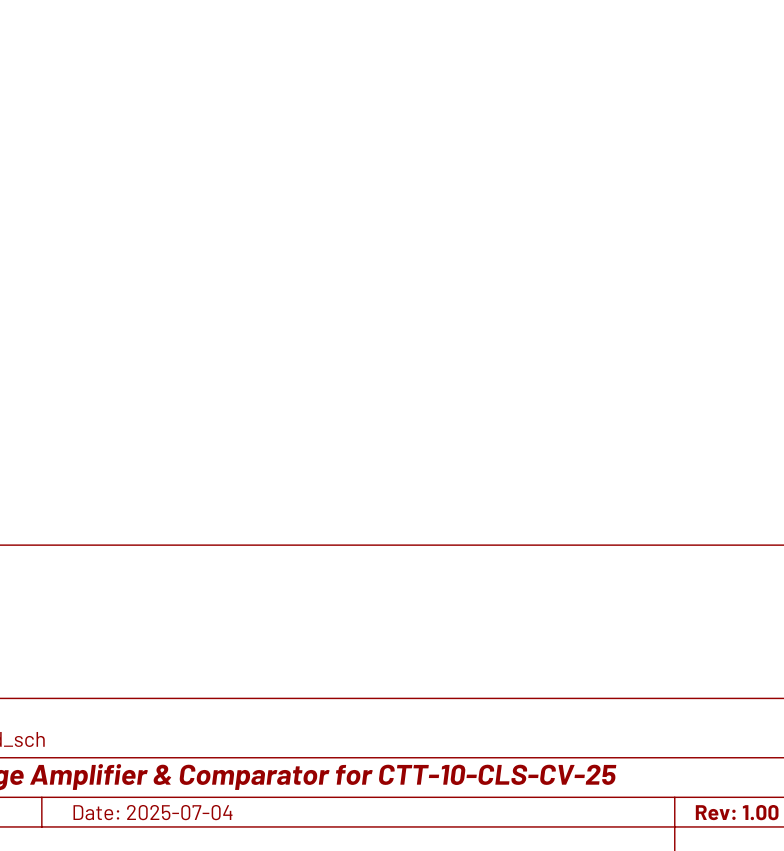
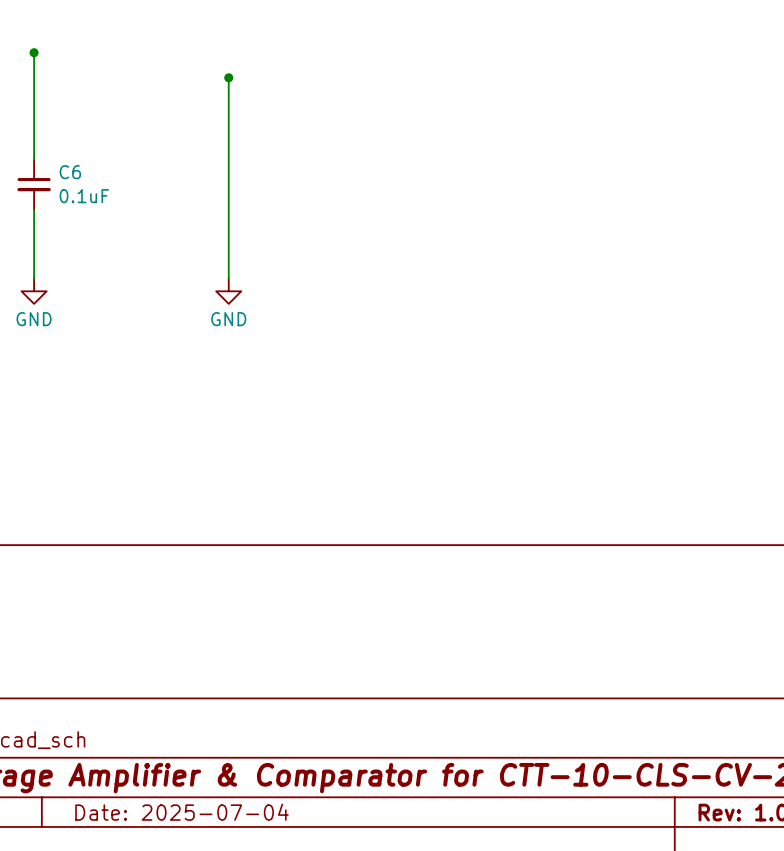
wire: none -> (34, 52) (34, 159)
junction: none -> (34, 52)
wire: none -> (228, 77) (228, 278)
junction: none -> (228, 77)
C6: none -> 0.1uF (34, 184)
wire: none -> (34, 209) (34, 278)
power symbol: none -> GND (34, 291)
power symbol: none -> GND (228, 291)

